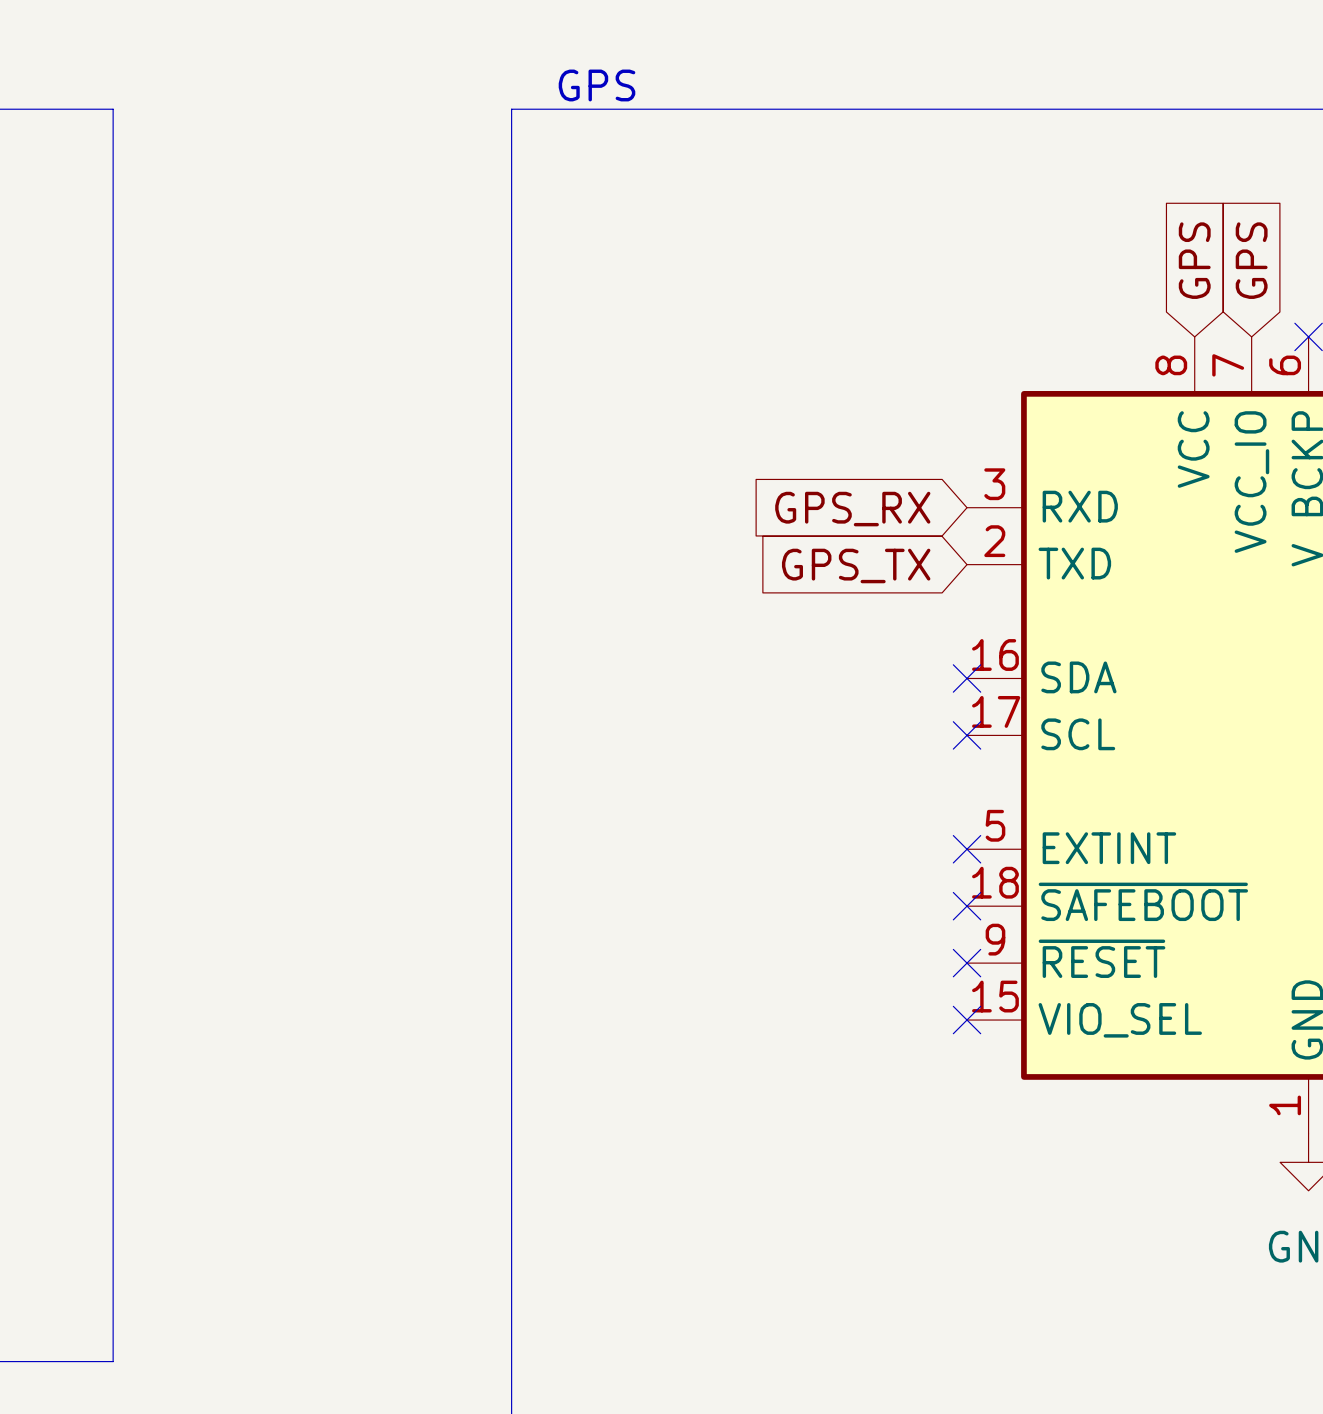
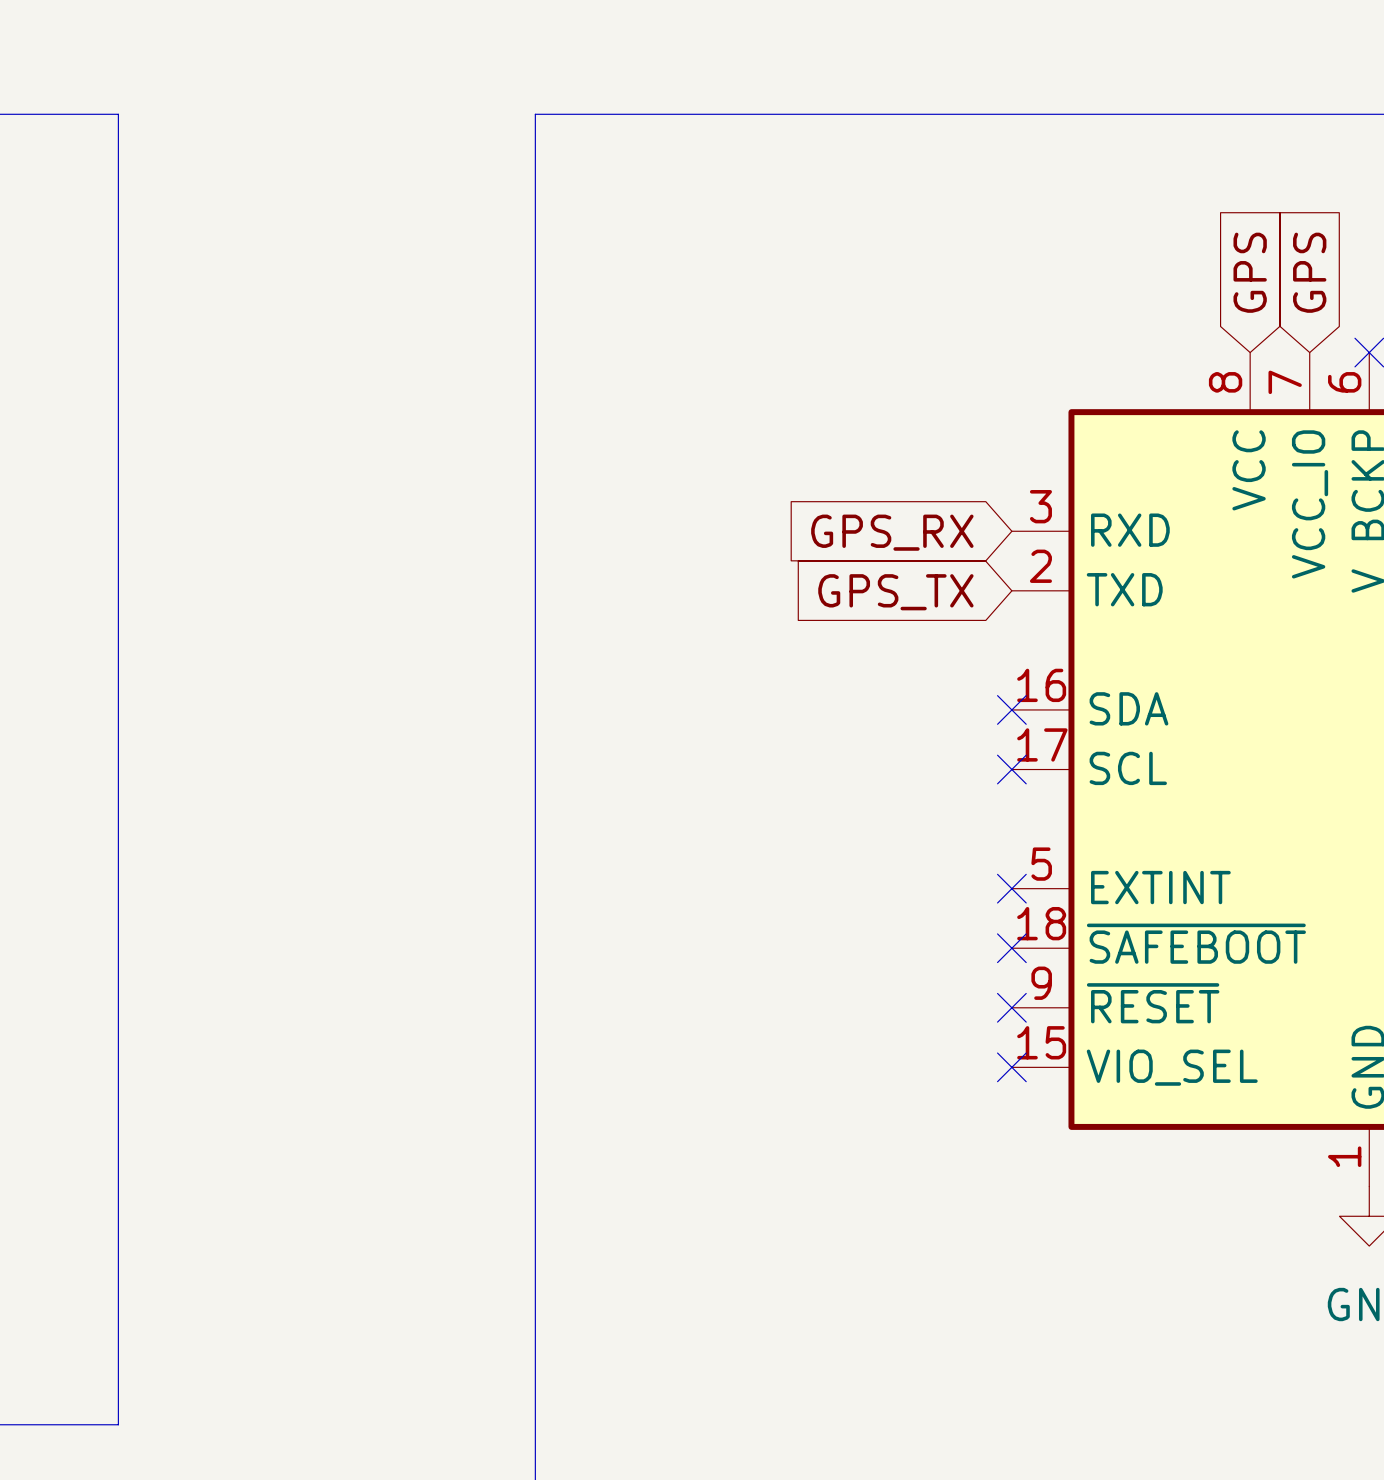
text: GPS (597, 85) -> none

